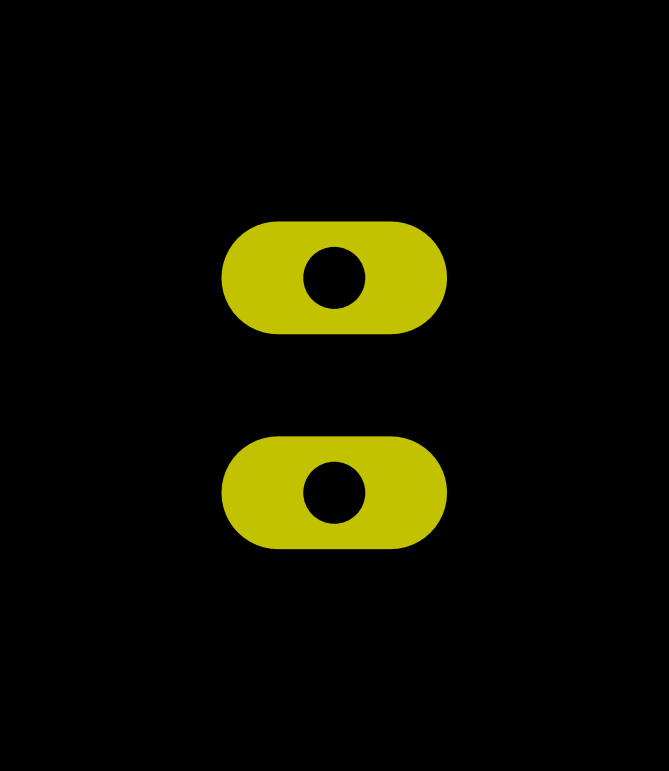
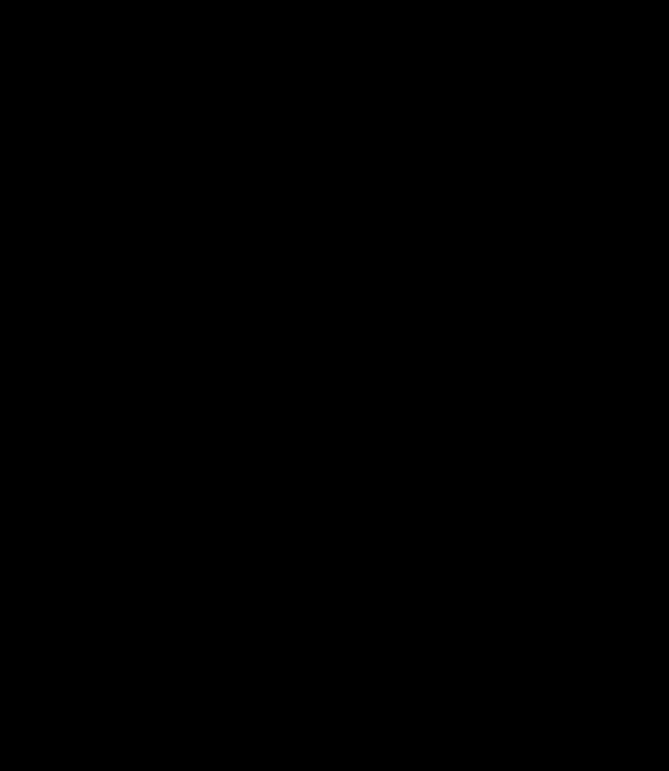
part: (334, 385) -> none

